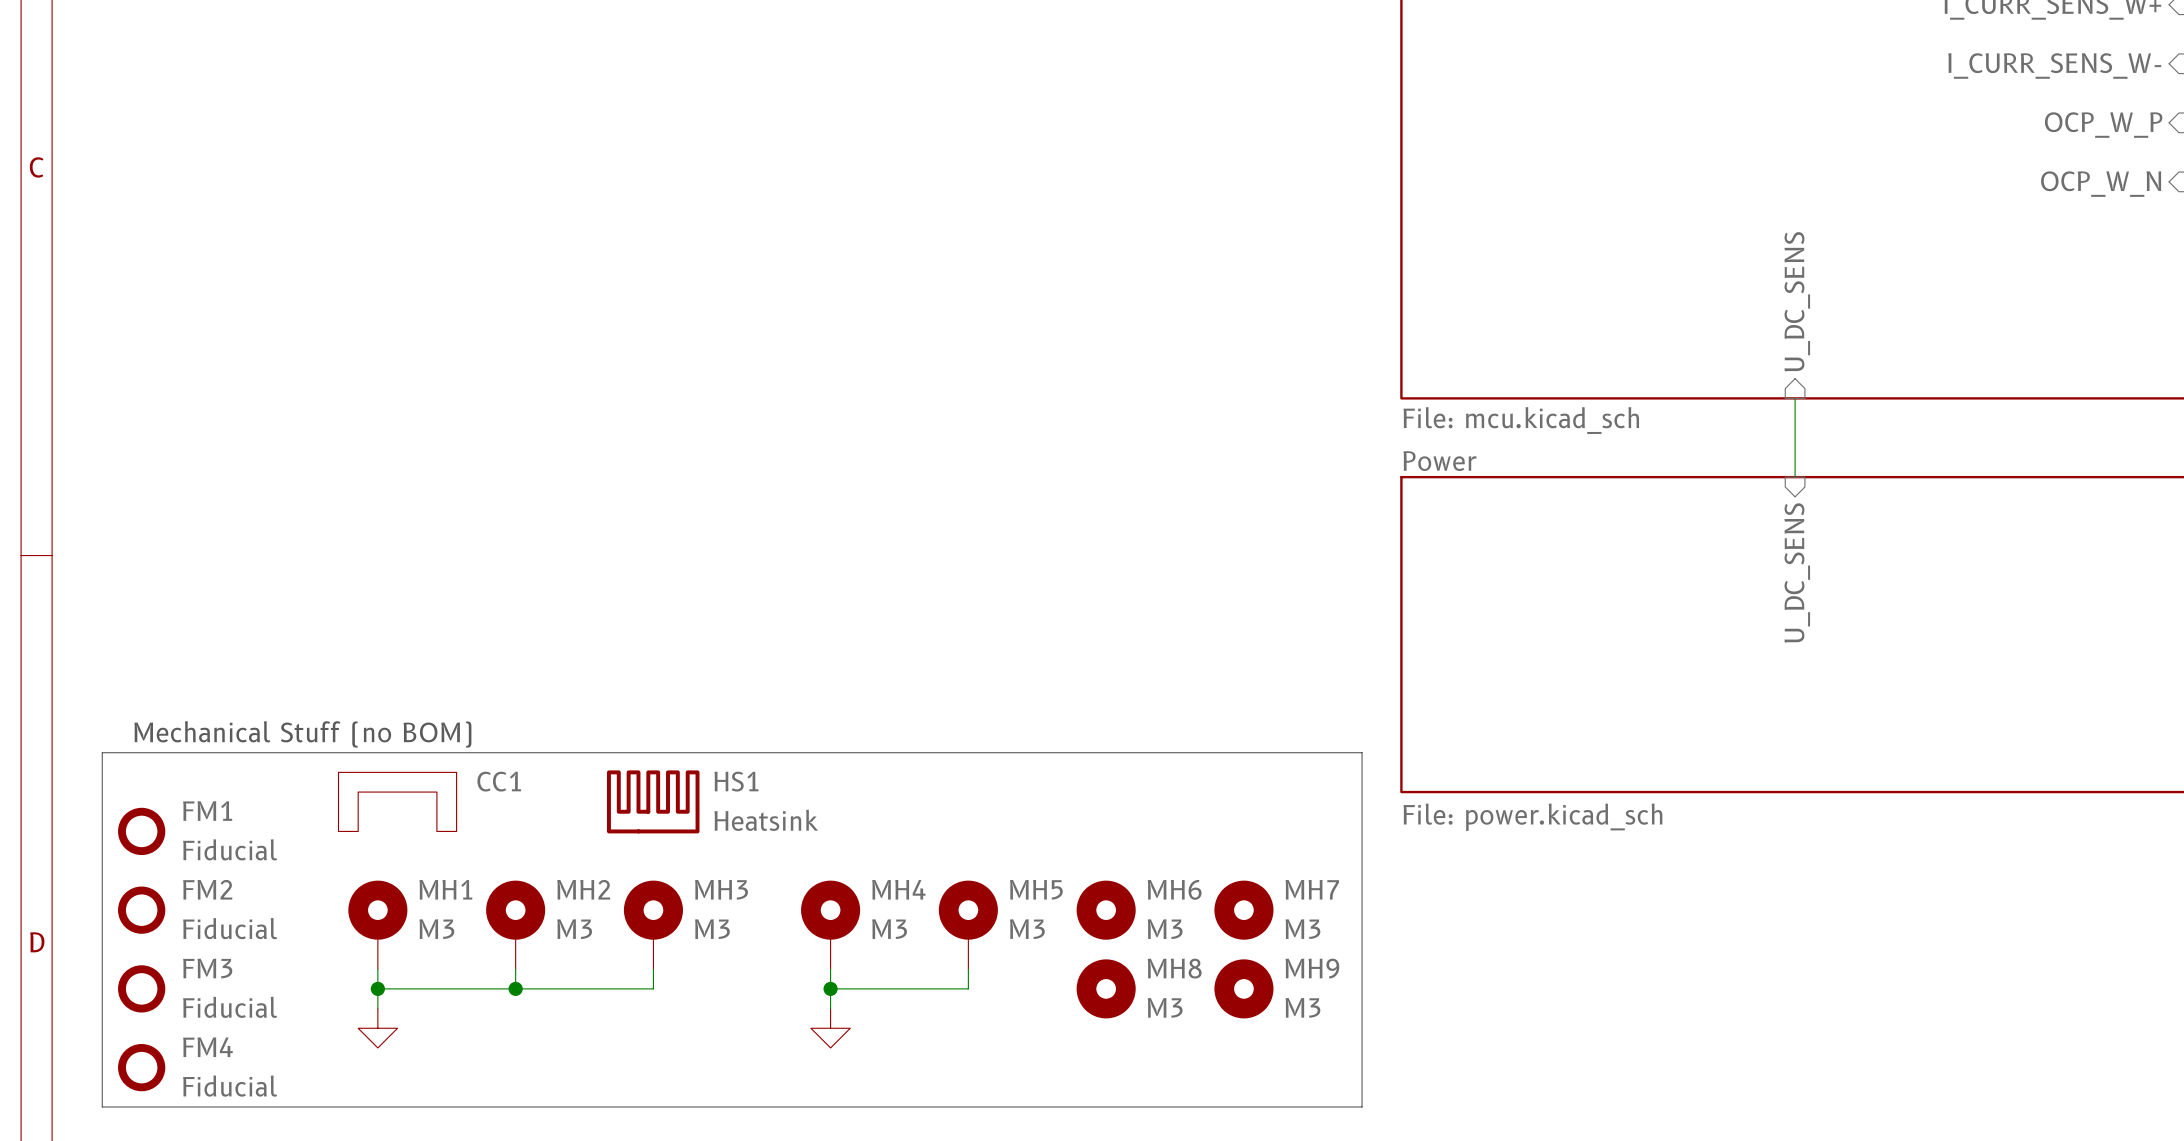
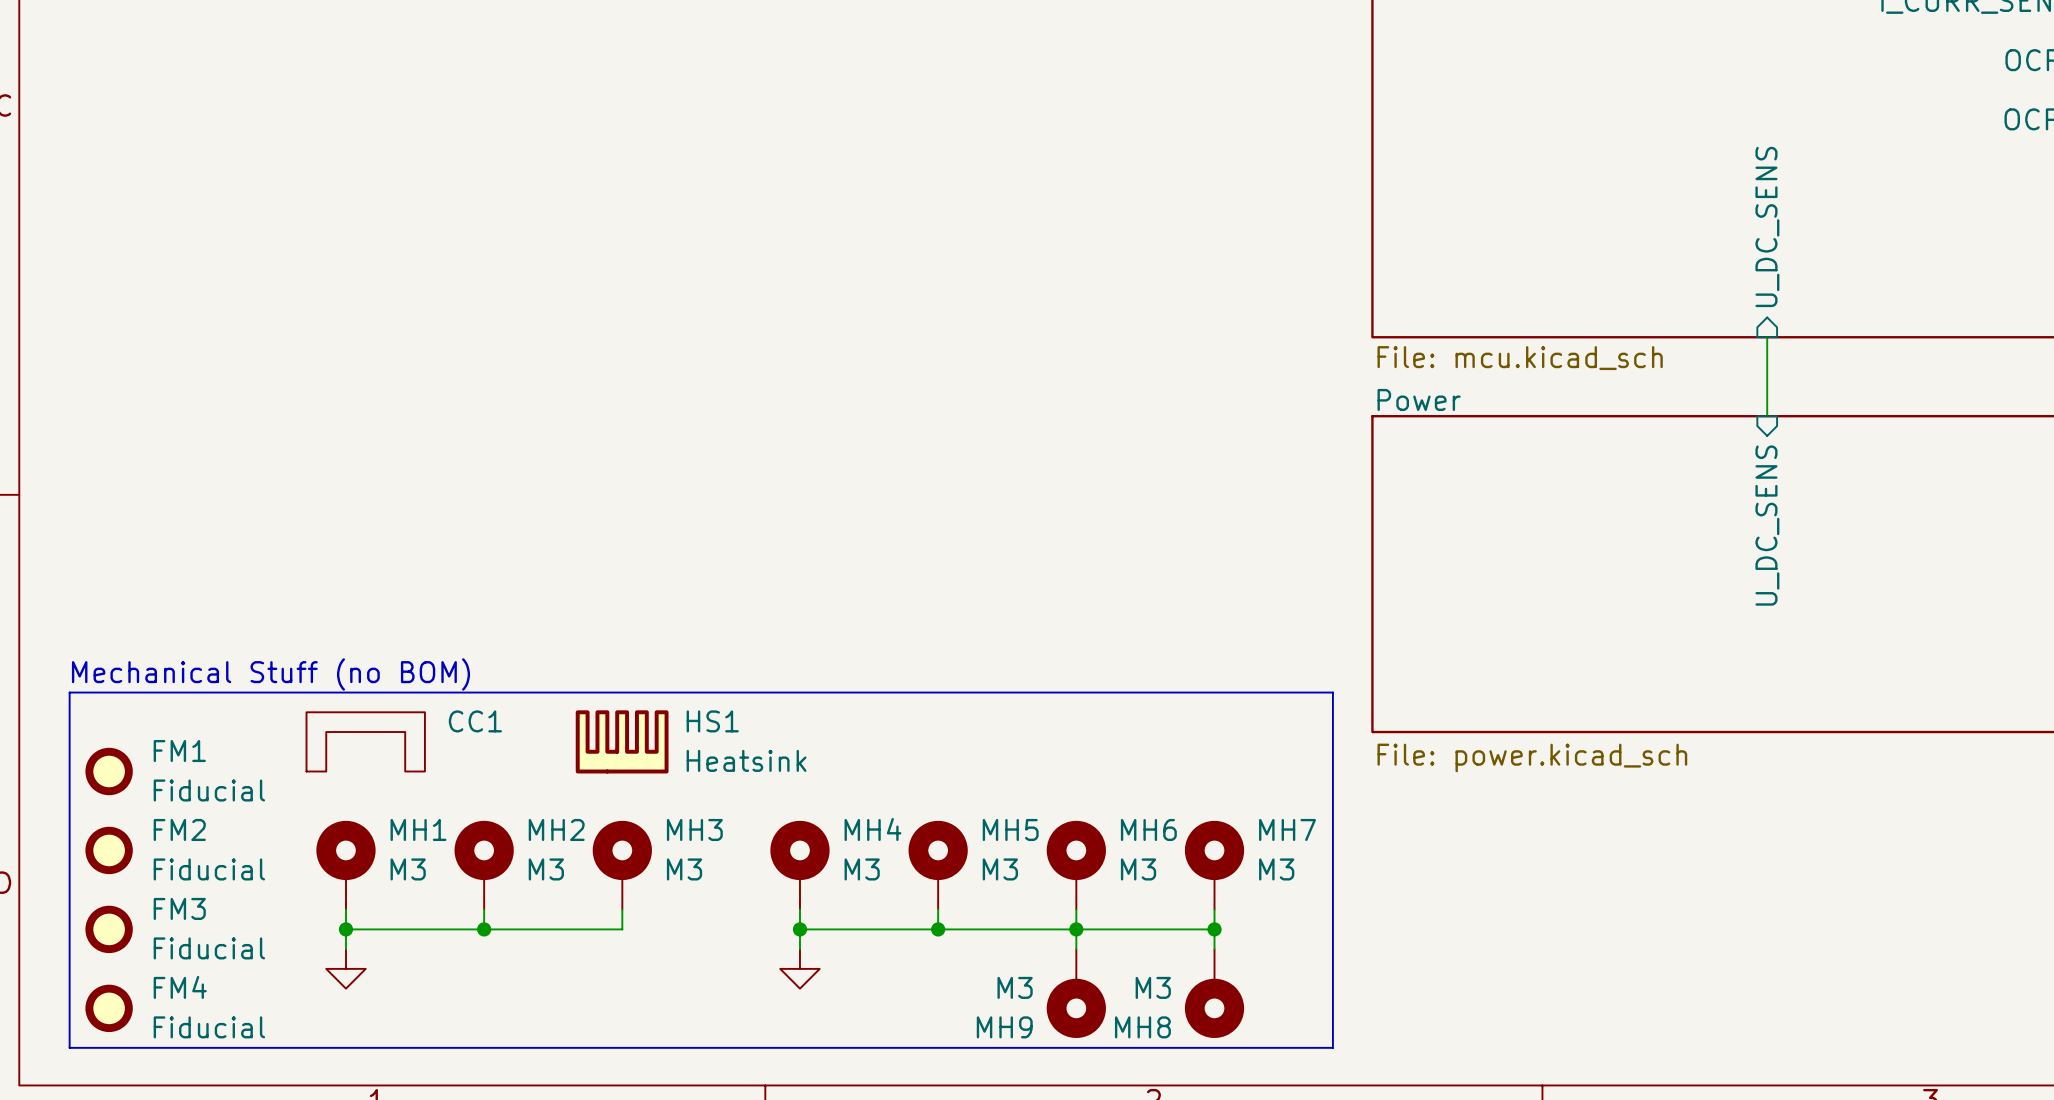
MH6 symbol: [1076, 880, 1136, 940] -> [1046, 820, 1106, 910]
MH7 symbol: [1214, 880, 1274, 940] -> [1184, 820, 1245, 910]
MH8 symbol: [1076, 959, 1136, 1019] -> [1184, 949, 1245, 1038]
MH9 symbol: [1214, 959, 1274, 1019] -> [1046, 949, 1106, 1038]
MH8 name position: MH8 (1174, 968) -> MH8 (1142, 1027)
MH9 name position: MH9 (1312, 968) -> MH9 (1004, 1027)
wire: none -> (938, 929) (1214, 929)
junction: none -> (938, 929)
junction: none -> (1076, 929)
junction: none -> (1214, 929)
MH8 value position: M3 (1165, 1007) -> M3 (1153, 987)
MH9 value position: M3 (1302, 1007) -> M3 (1015, 987)

